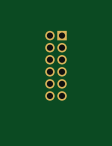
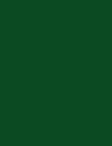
part: (55, 65) -> none

